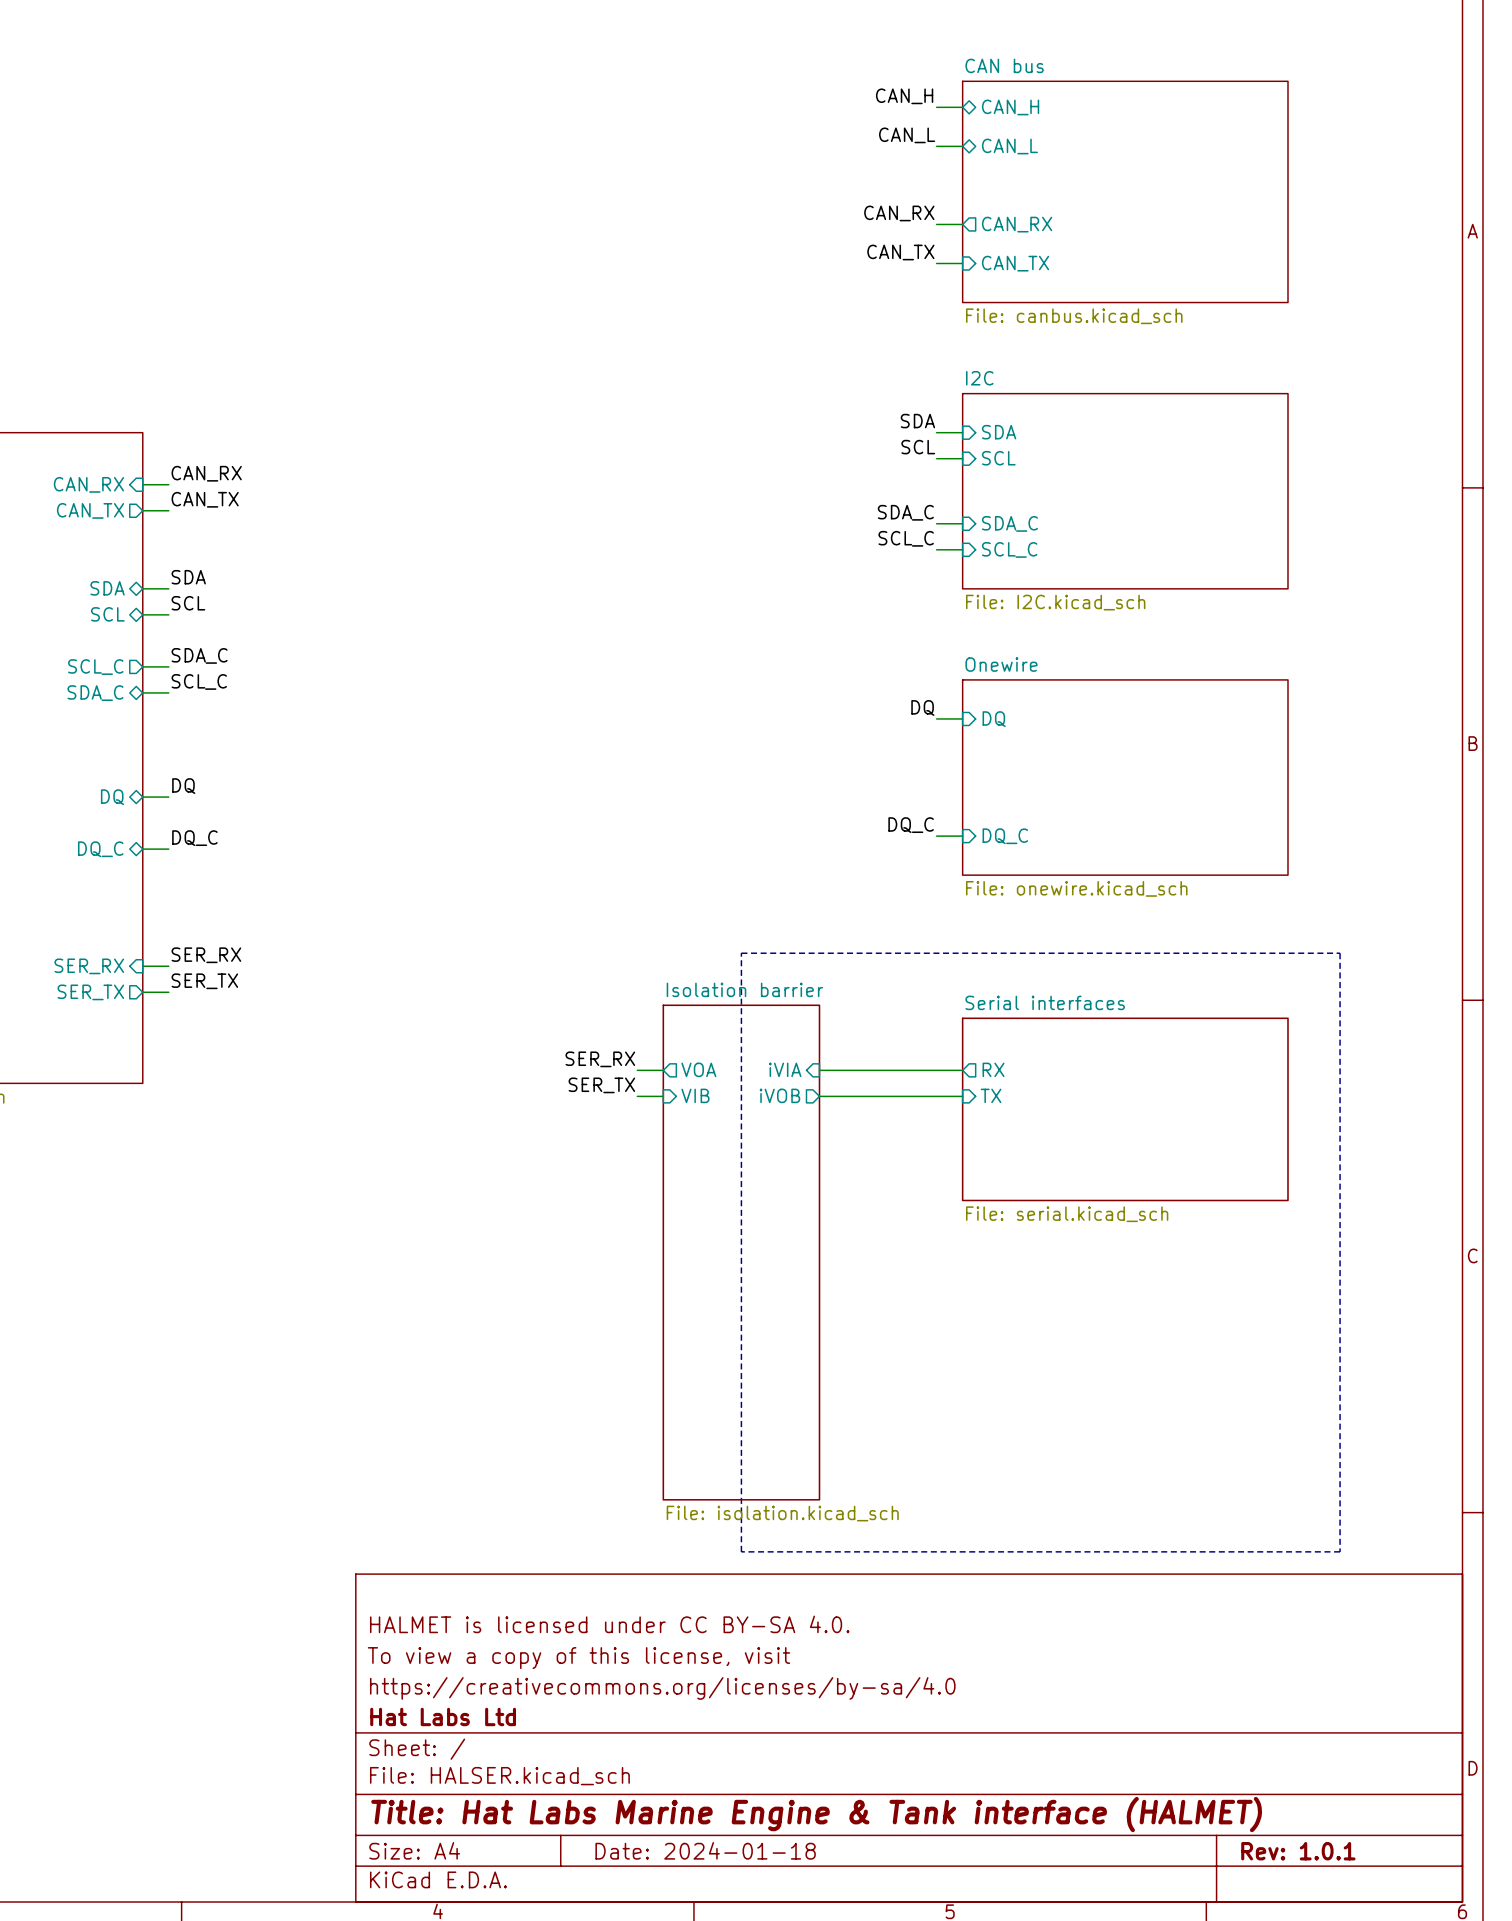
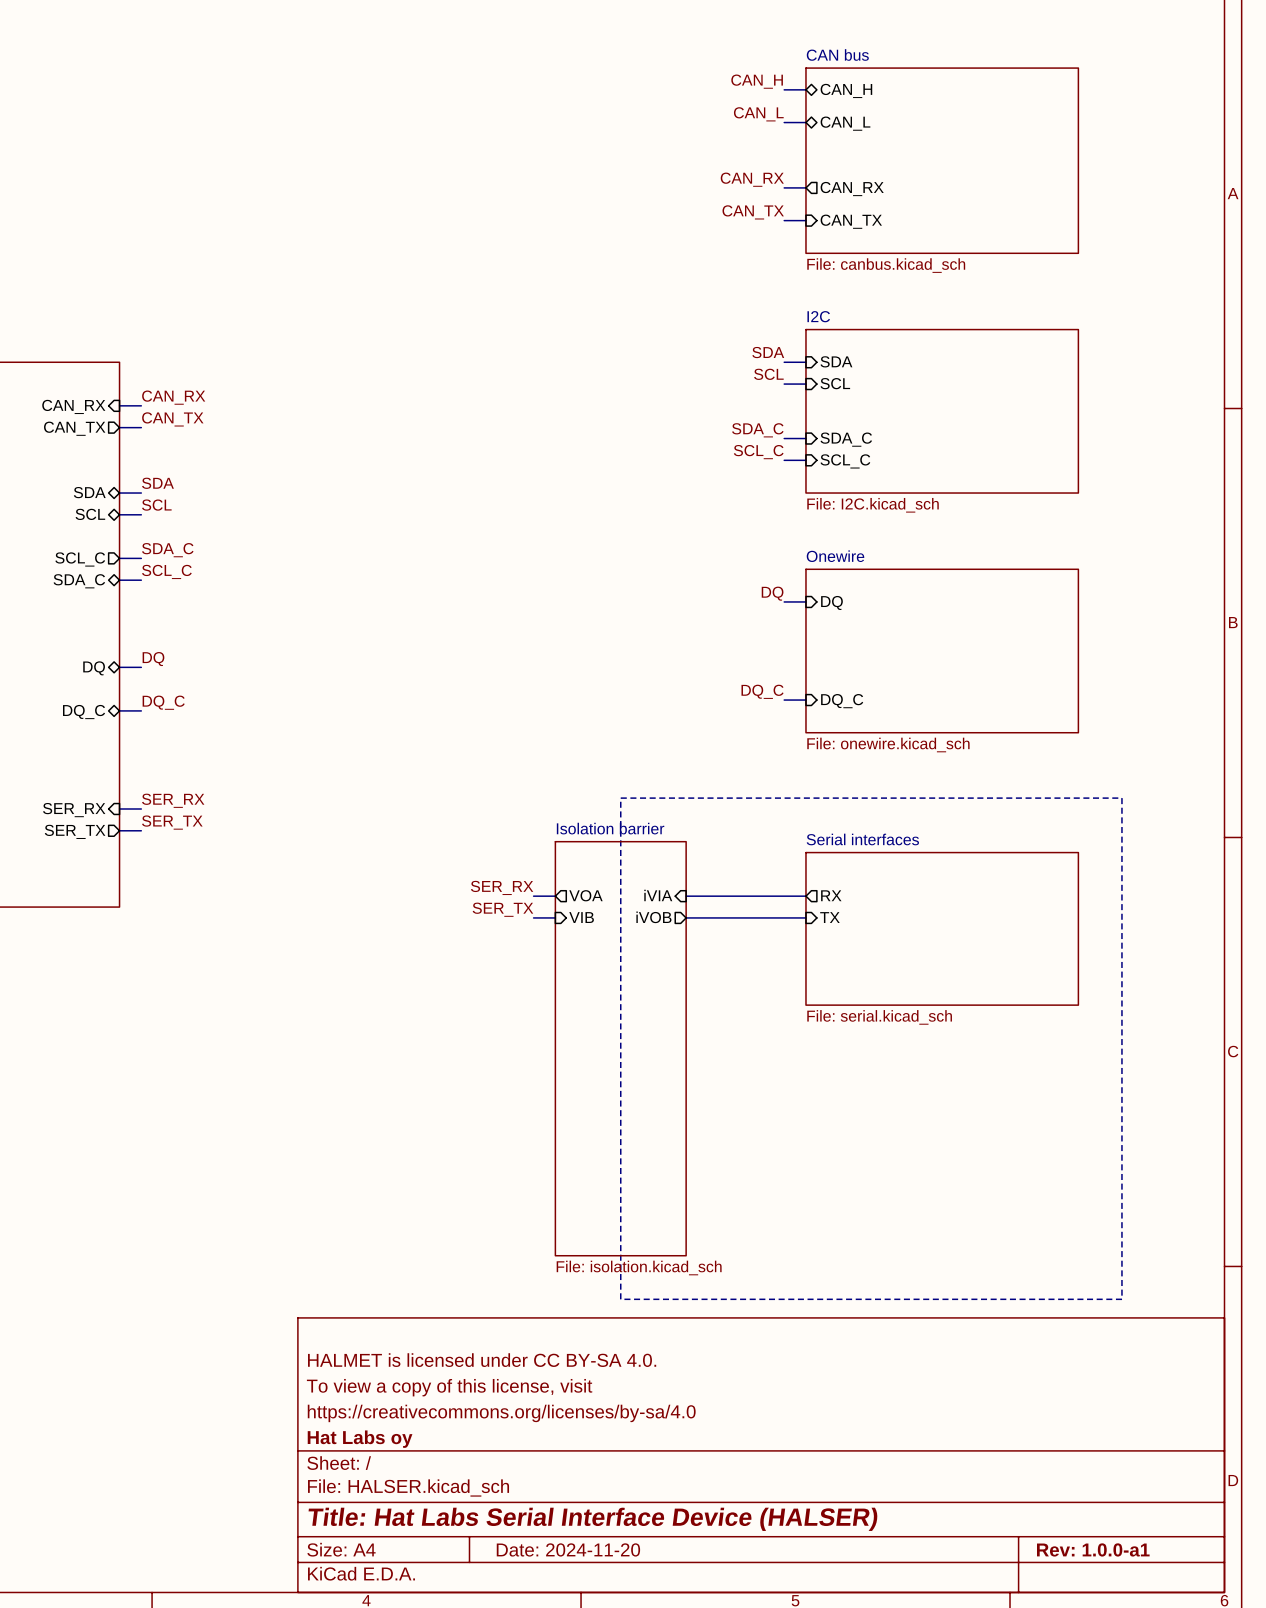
title block: Hat Labs Ltd (443, 1716) -> Hat Labs oy (360, 1439)
title block: Title: Hat Labs Marine Engine & Tank interface (HALMET) (816, 1814) -> Title: Hat Labs Serial Interface Device (HALSER) (593, 1519)
title block: Date: 2024-01-18 (705, 1850) -> Date: 2024-11-20 (568, 1549)
title block: Rev: 1.0.1 (1298, 1851) -> Rev: 1.0.0-a1 (1093, 1549)

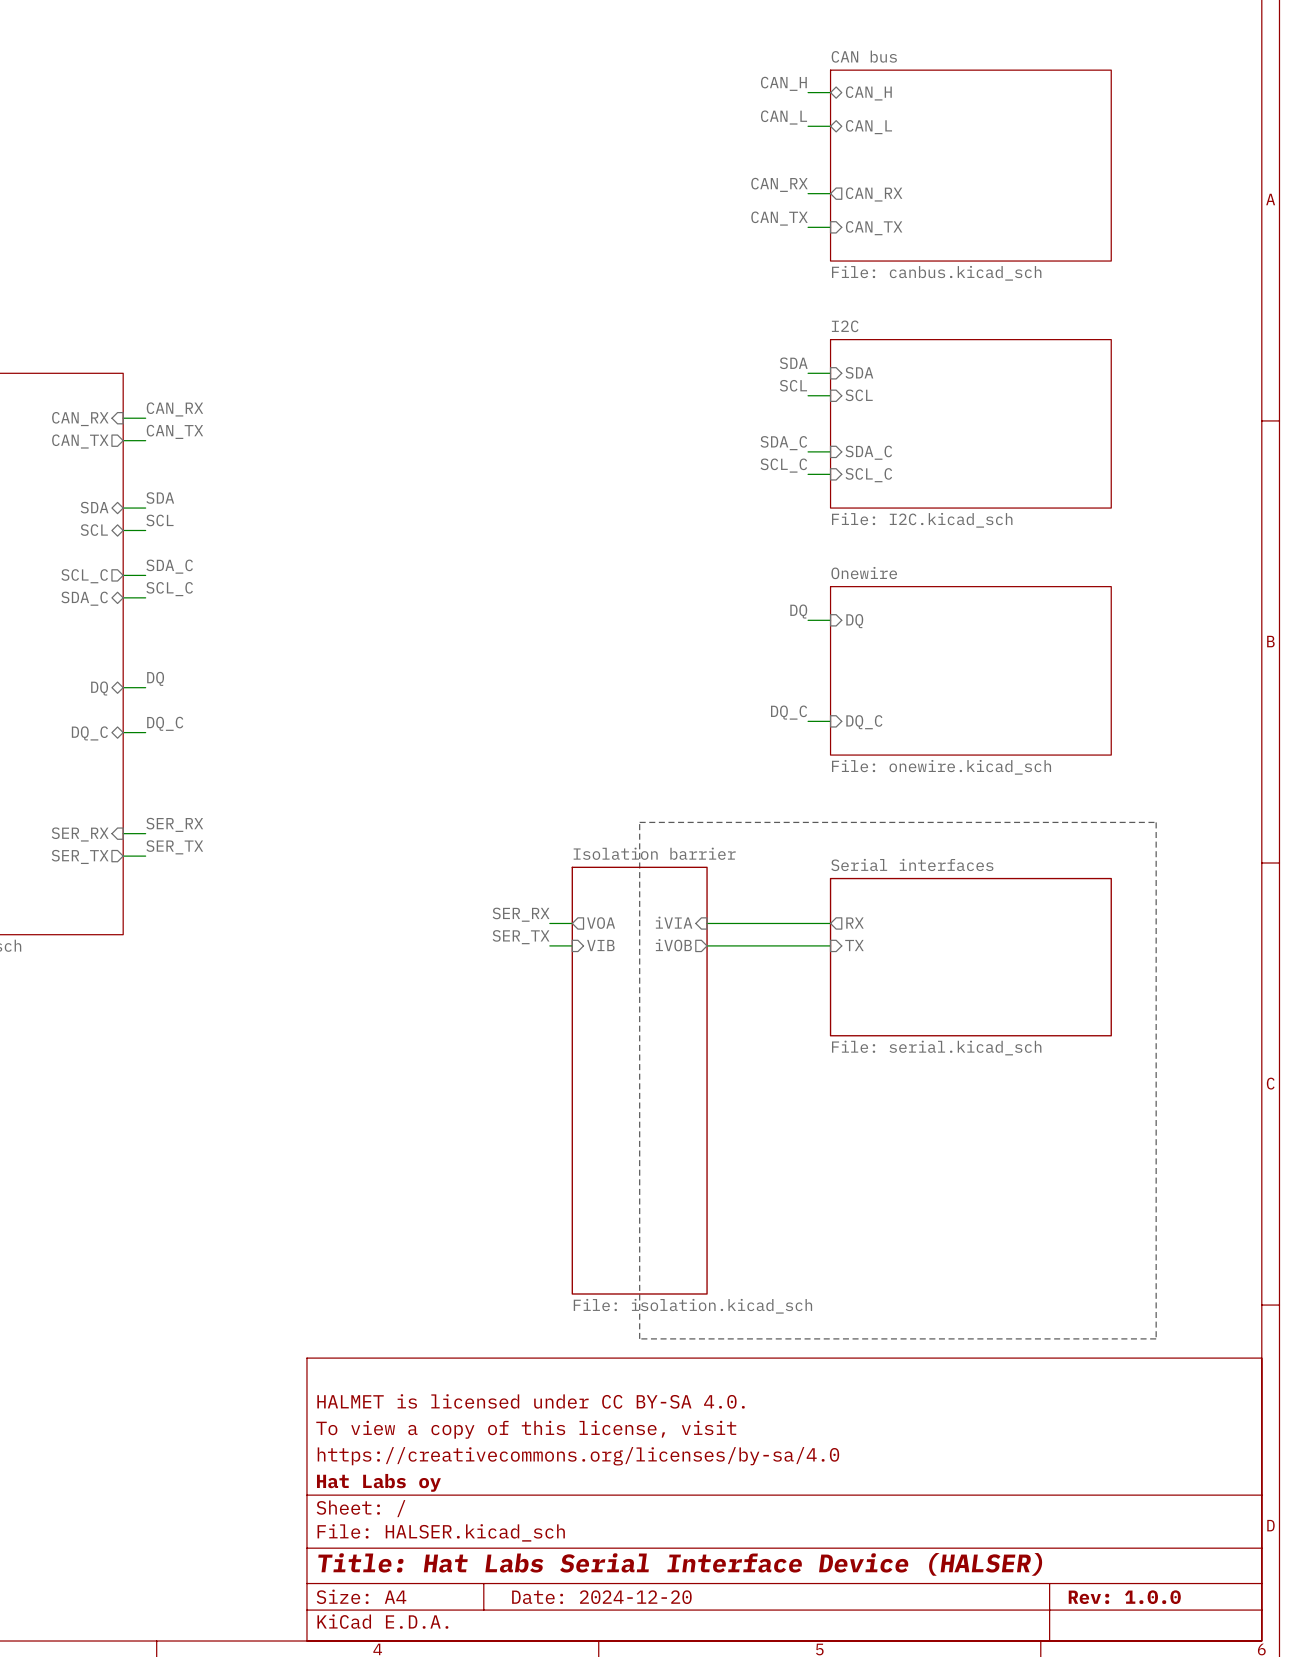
title block: Date: 2024-11-20 (568, 1549) -> Date: 2024-12-20 (601, 1597)
title block: Rev: 1.0.0-a1 (1093, 1549) -> Rev: 1.0.0 (1124, 1597)

